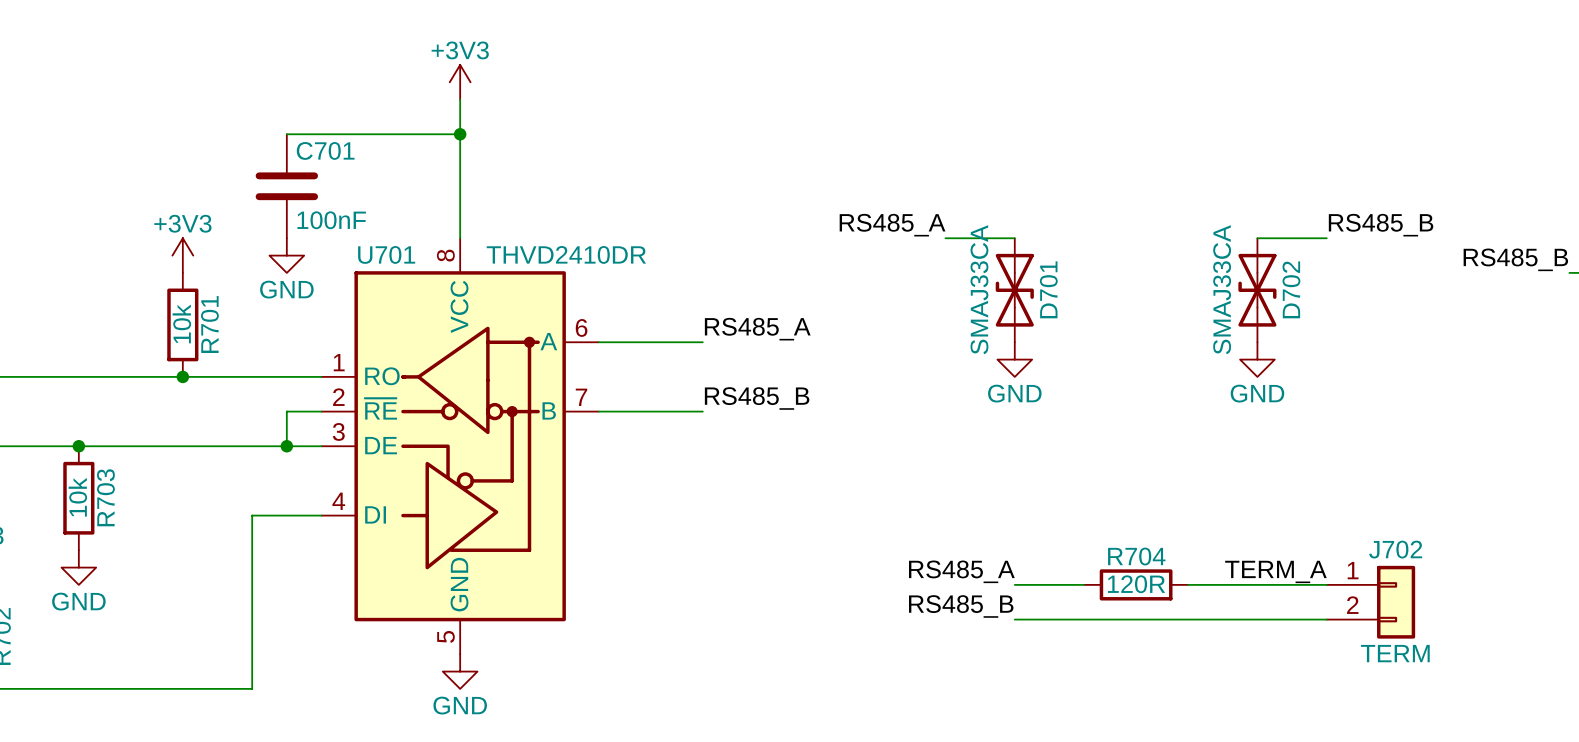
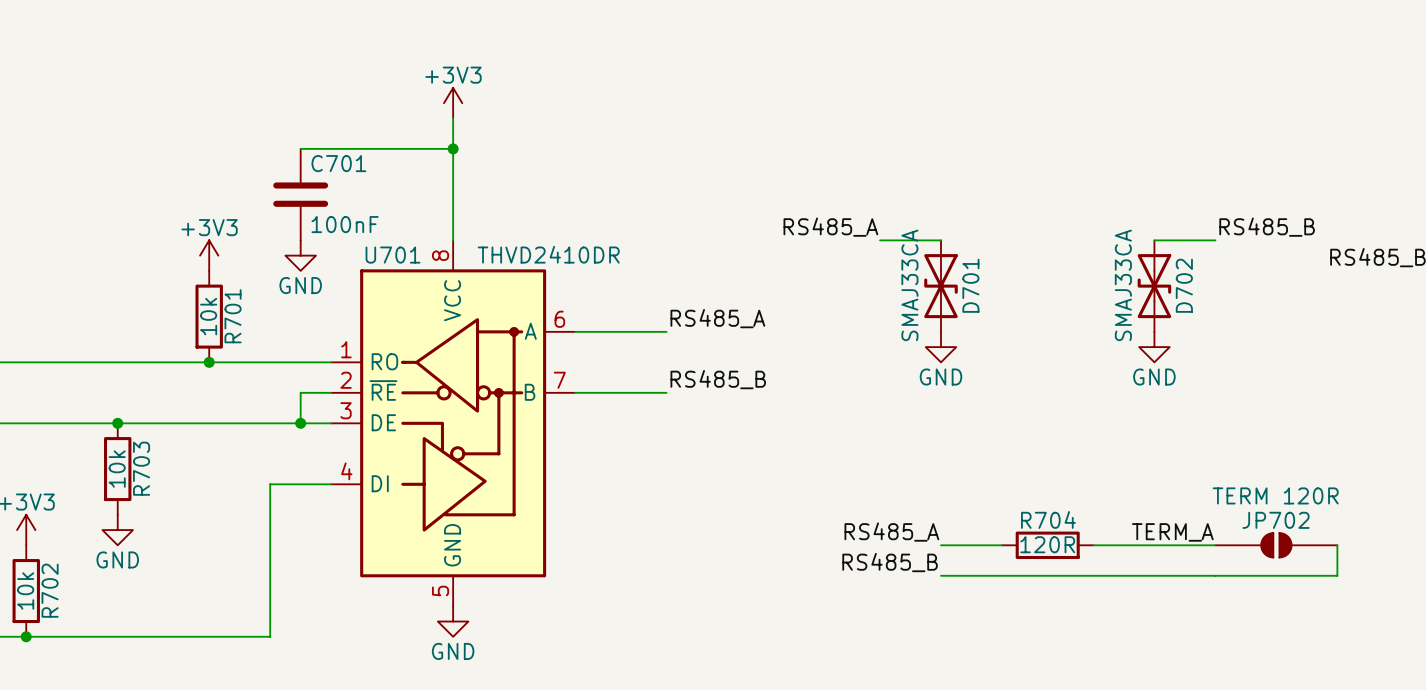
JP702: none -> TERM 120R (1276, 545)
wire: none -> (1337, 545) (1337, 575) (1215, 575)
J702: TERM (1370, 602) -> none

